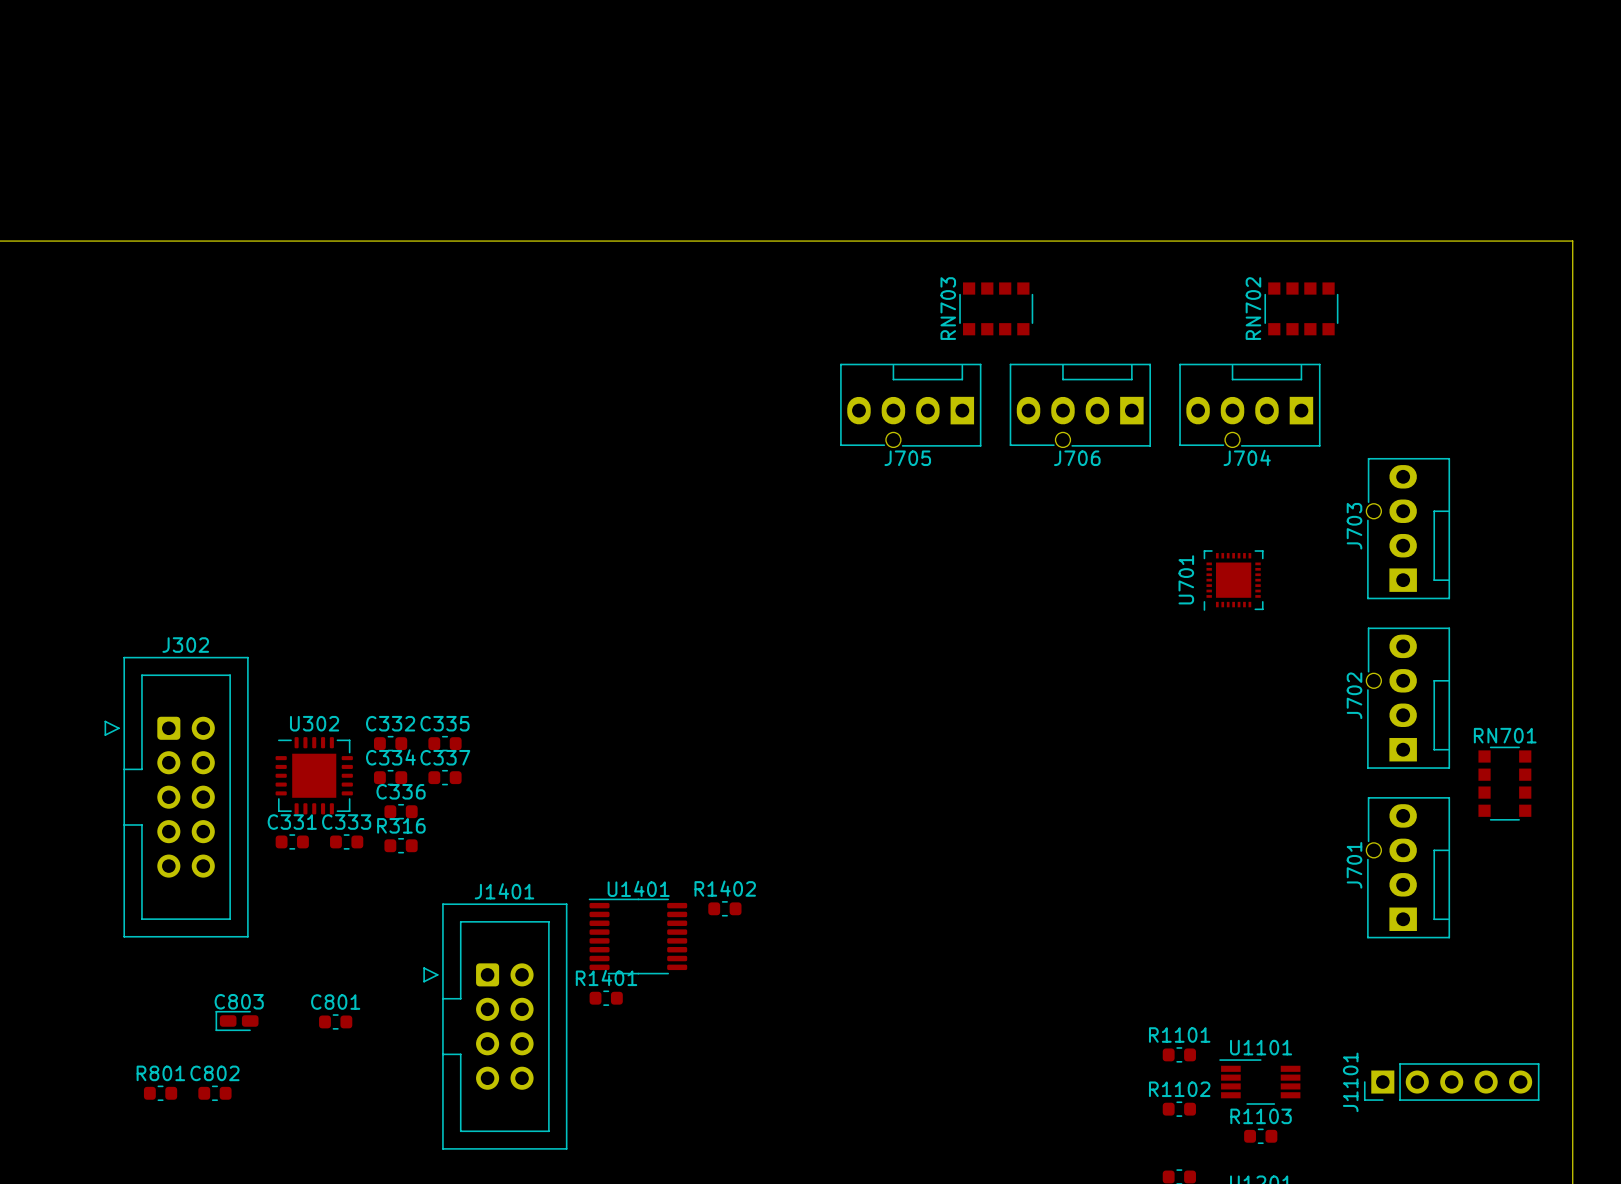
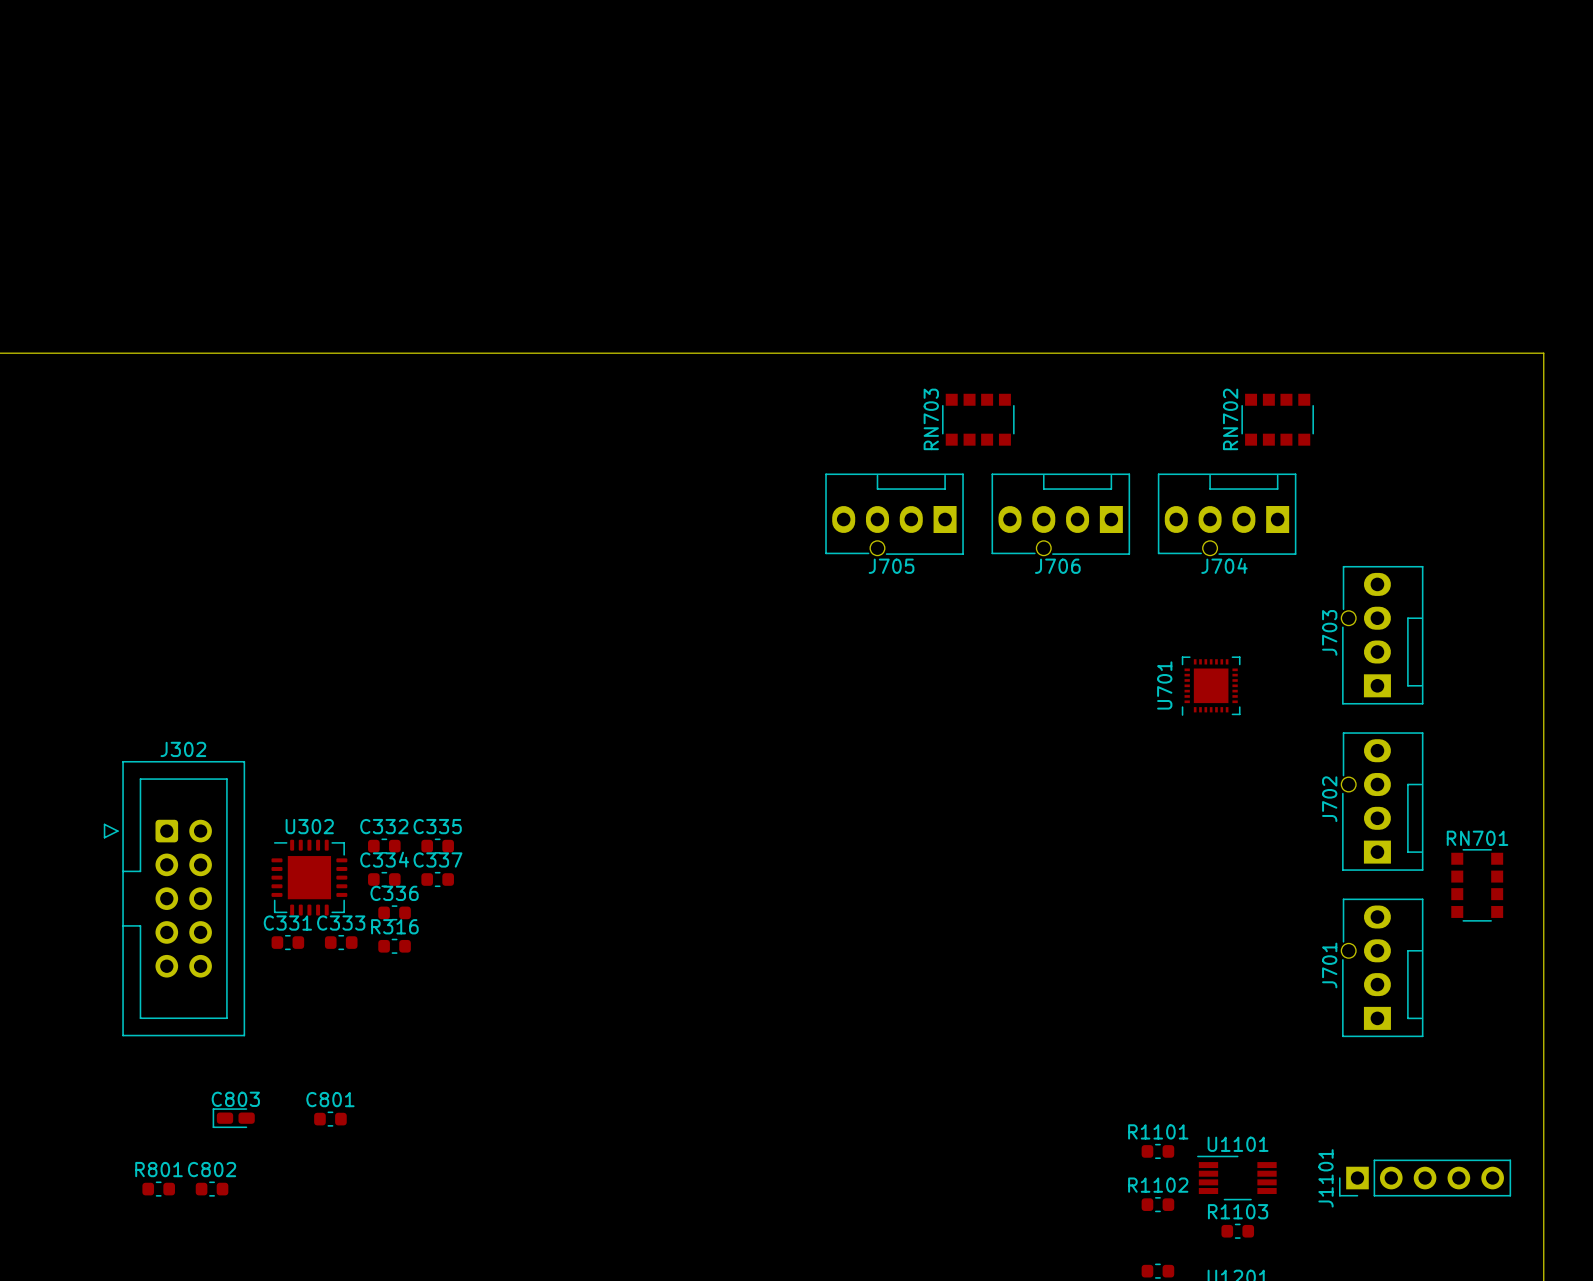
R1402: (724, 908) -> none
U1401: (637, 936) -> none
R1401: (606, 998) -> none
J1401: (495, 1026) -> none

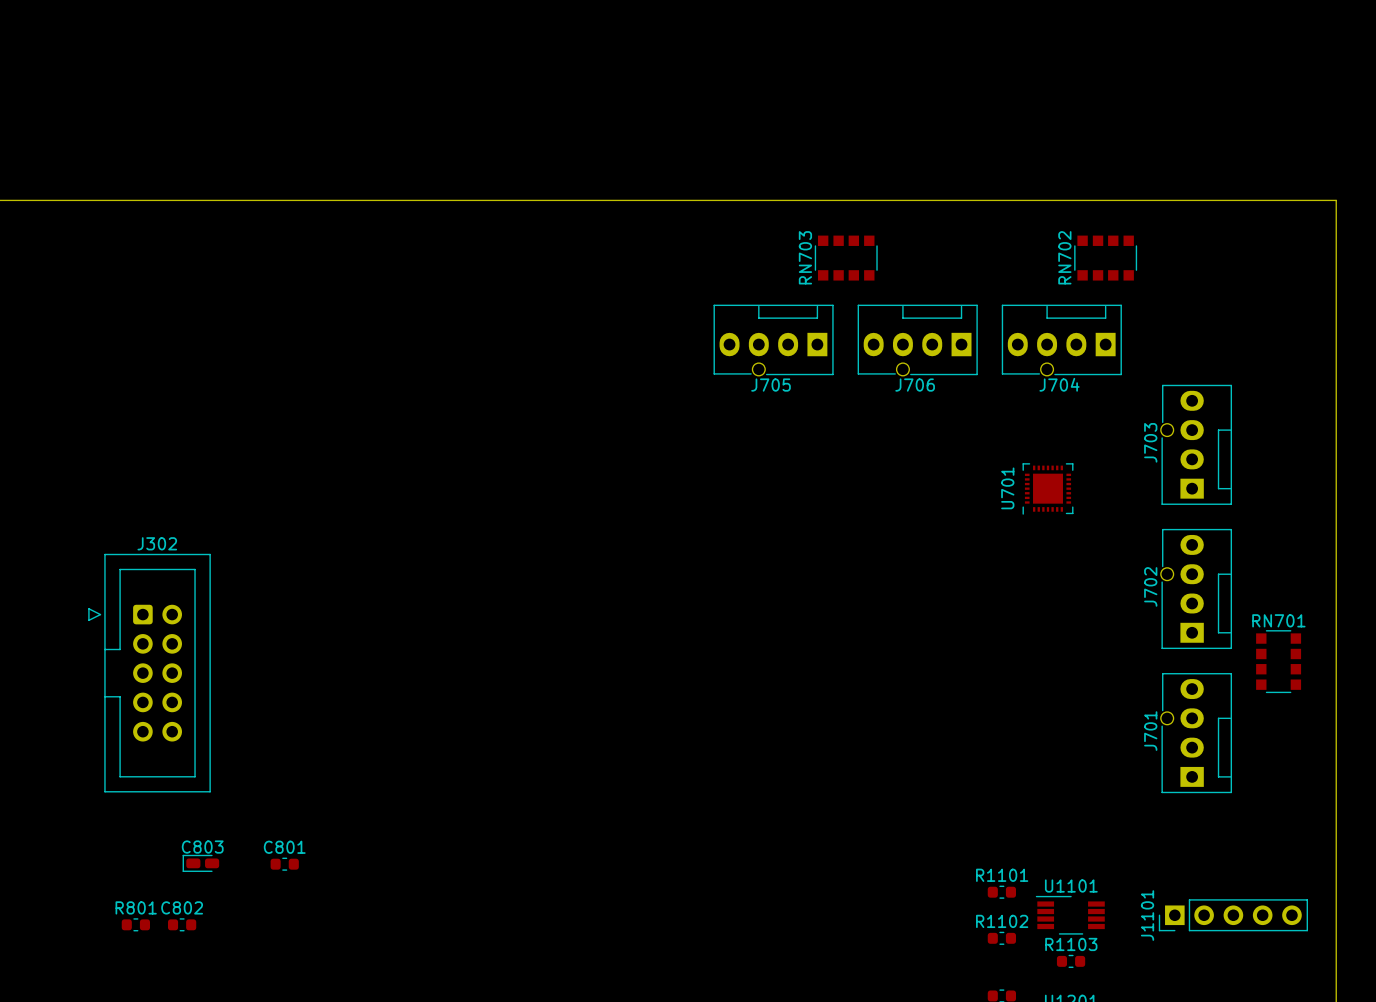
C332: (384, 846) -> none
C335: (437, 846) -> none
U302: (309, 877) -> none
C334: (384, 879) -> none
C337: (437, 879) -> none
C336: (394, 912) -> none
C331: (287, 942) -> none
C333: (341, 942) -> none
R316: (394, 946) -> none

